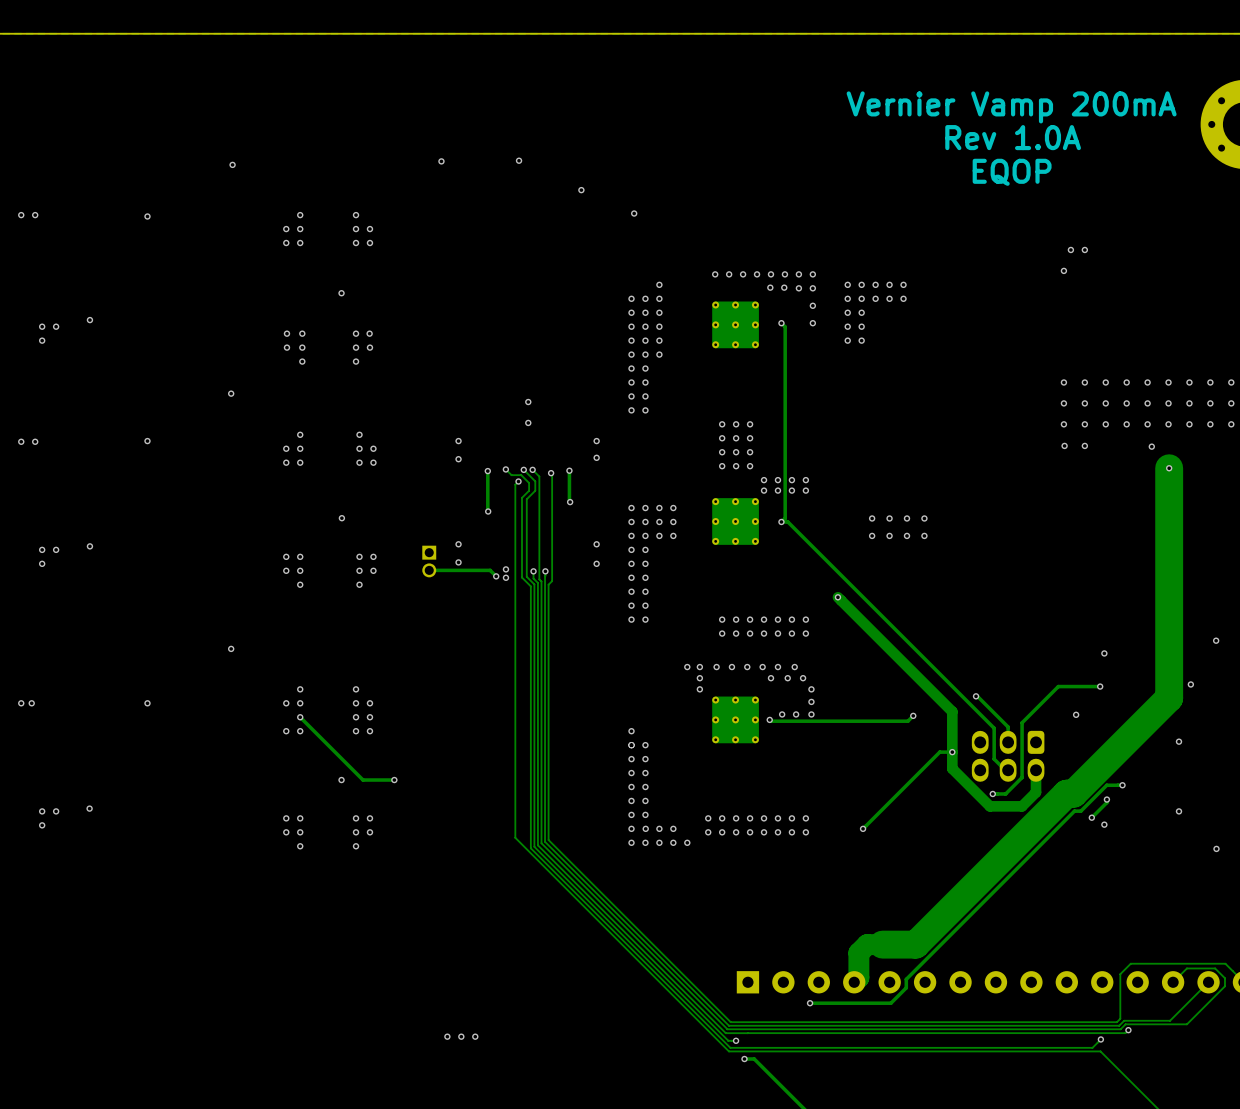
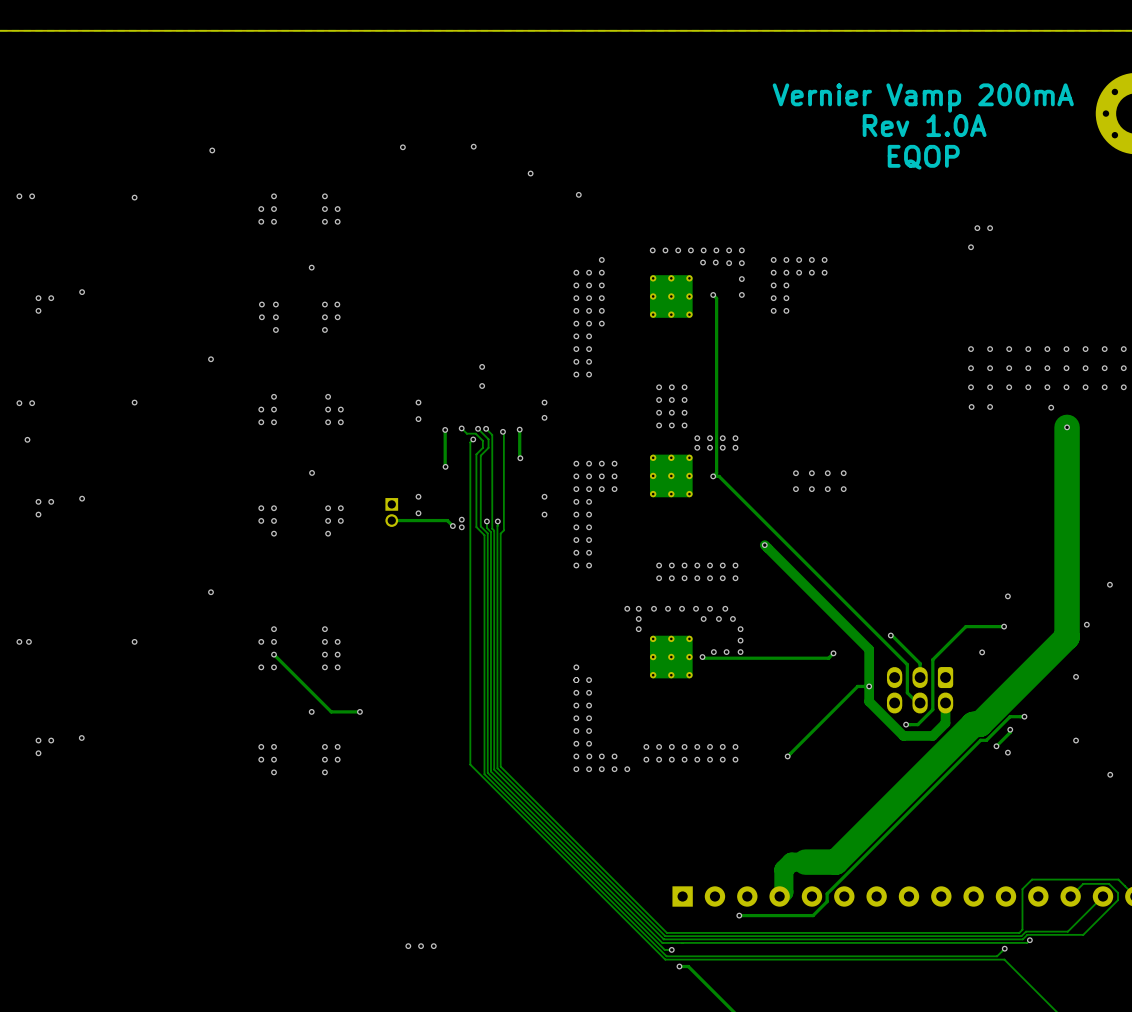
via: none -> (27, 439)

